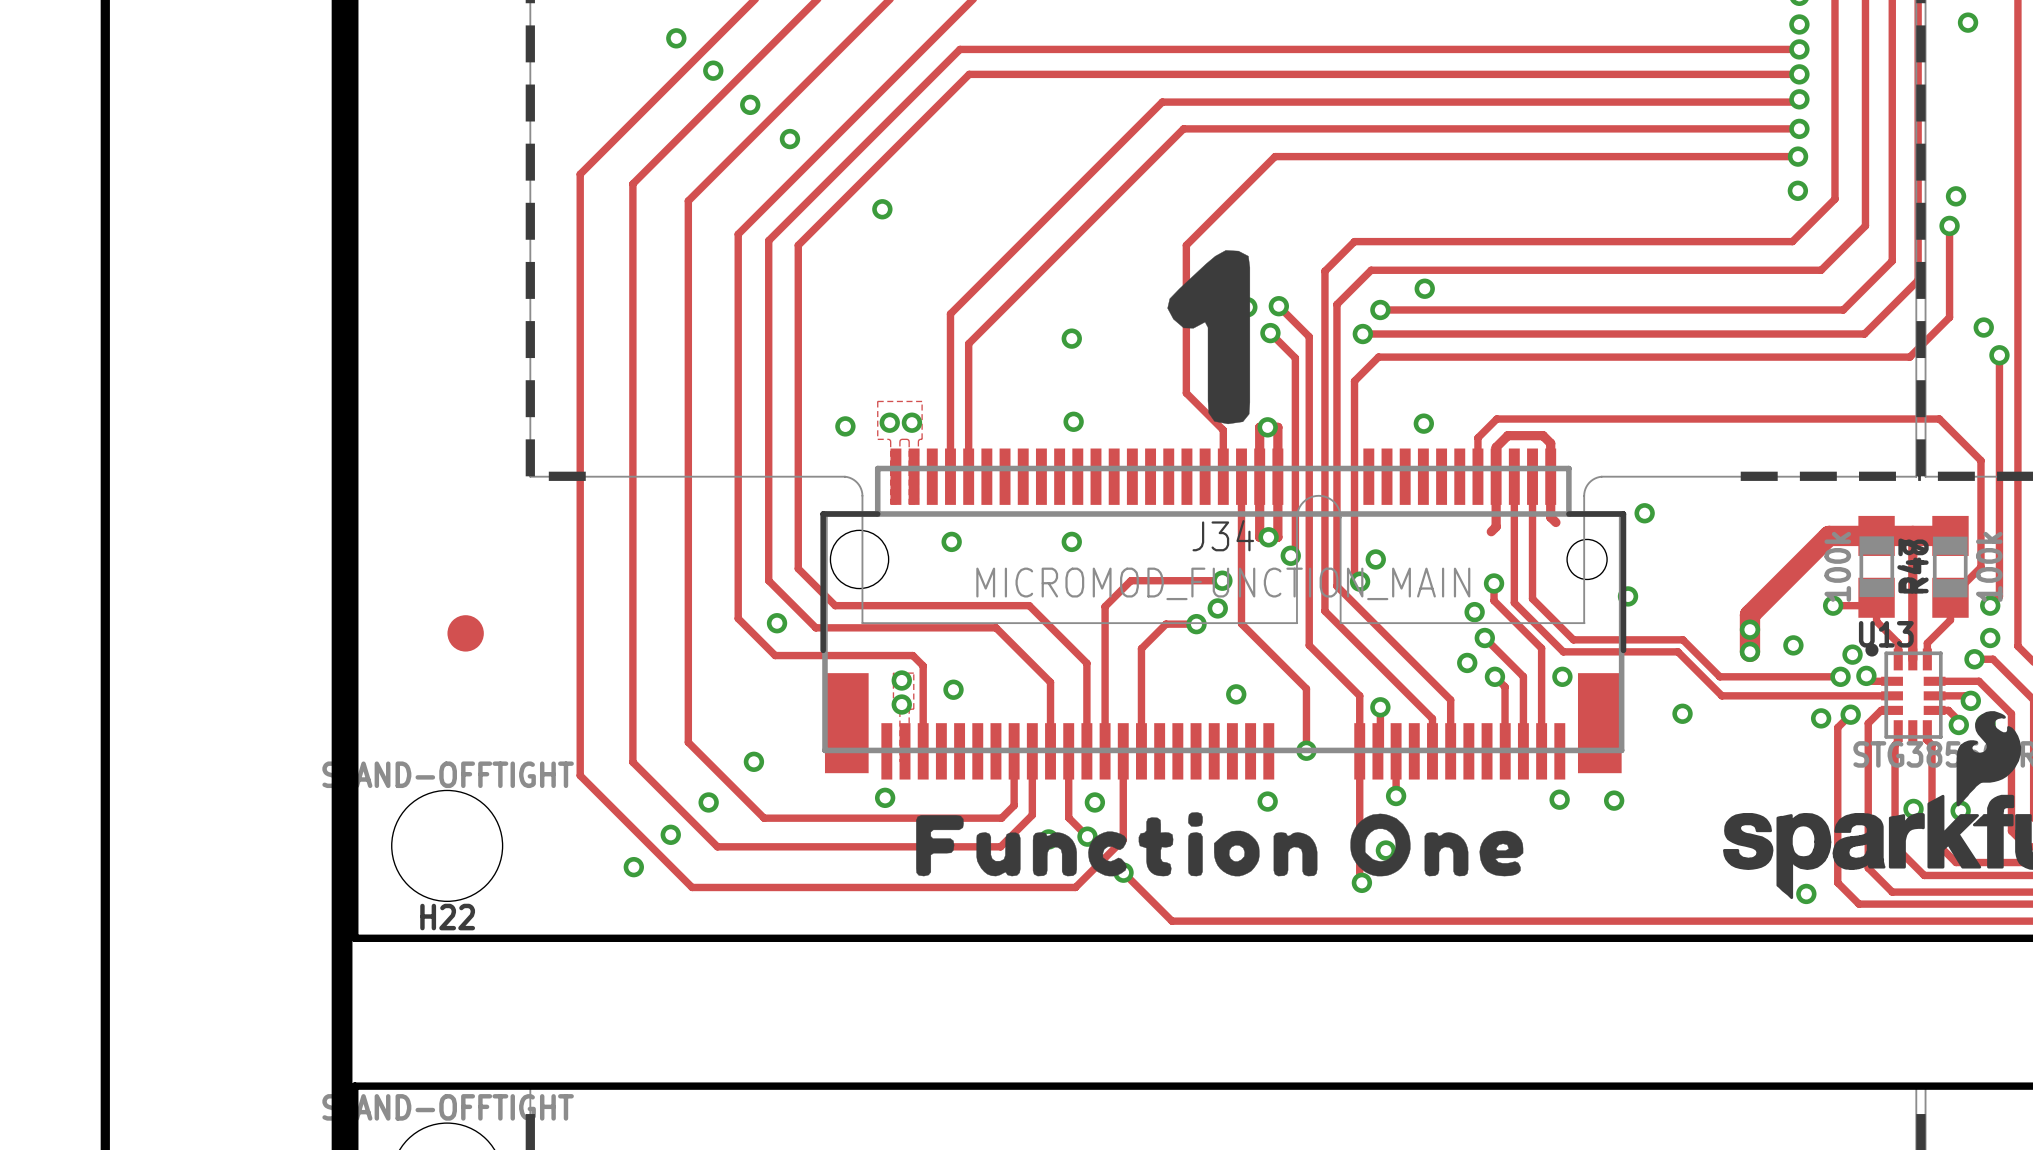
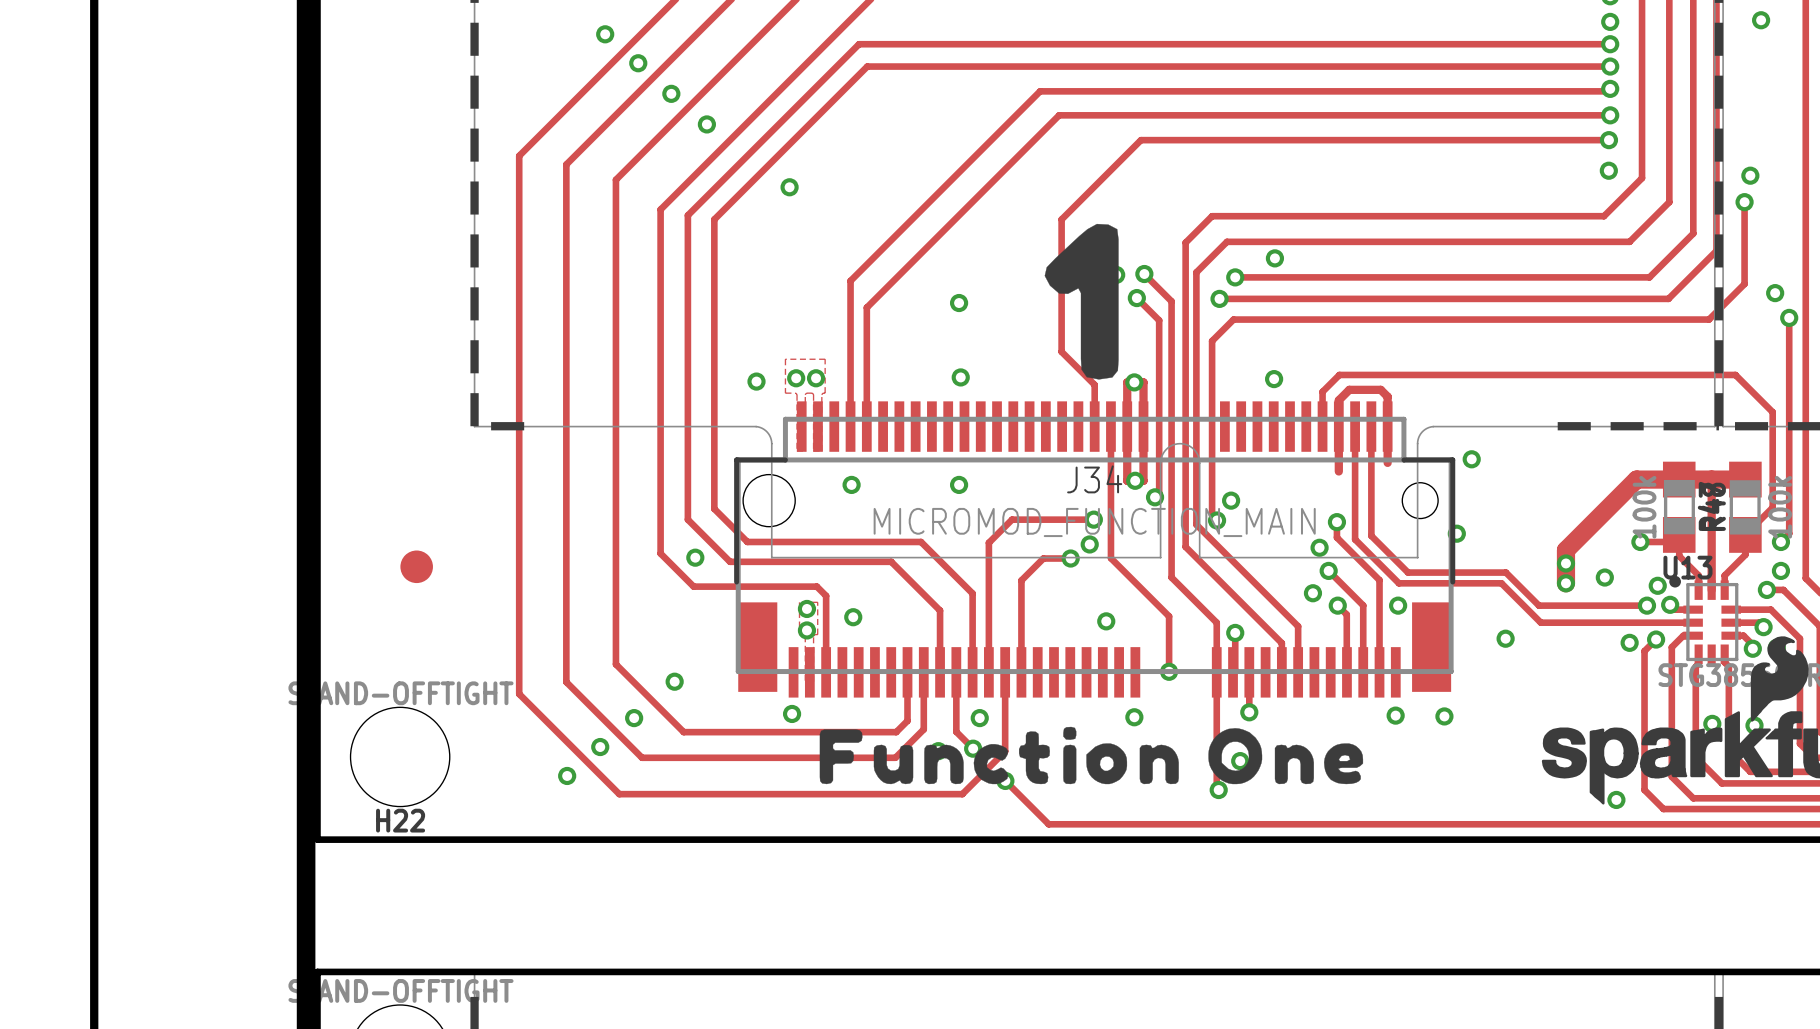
track: (1550, 517) (1555, 522) -> none
track: (1496, 526) (1491, 531) -> none

